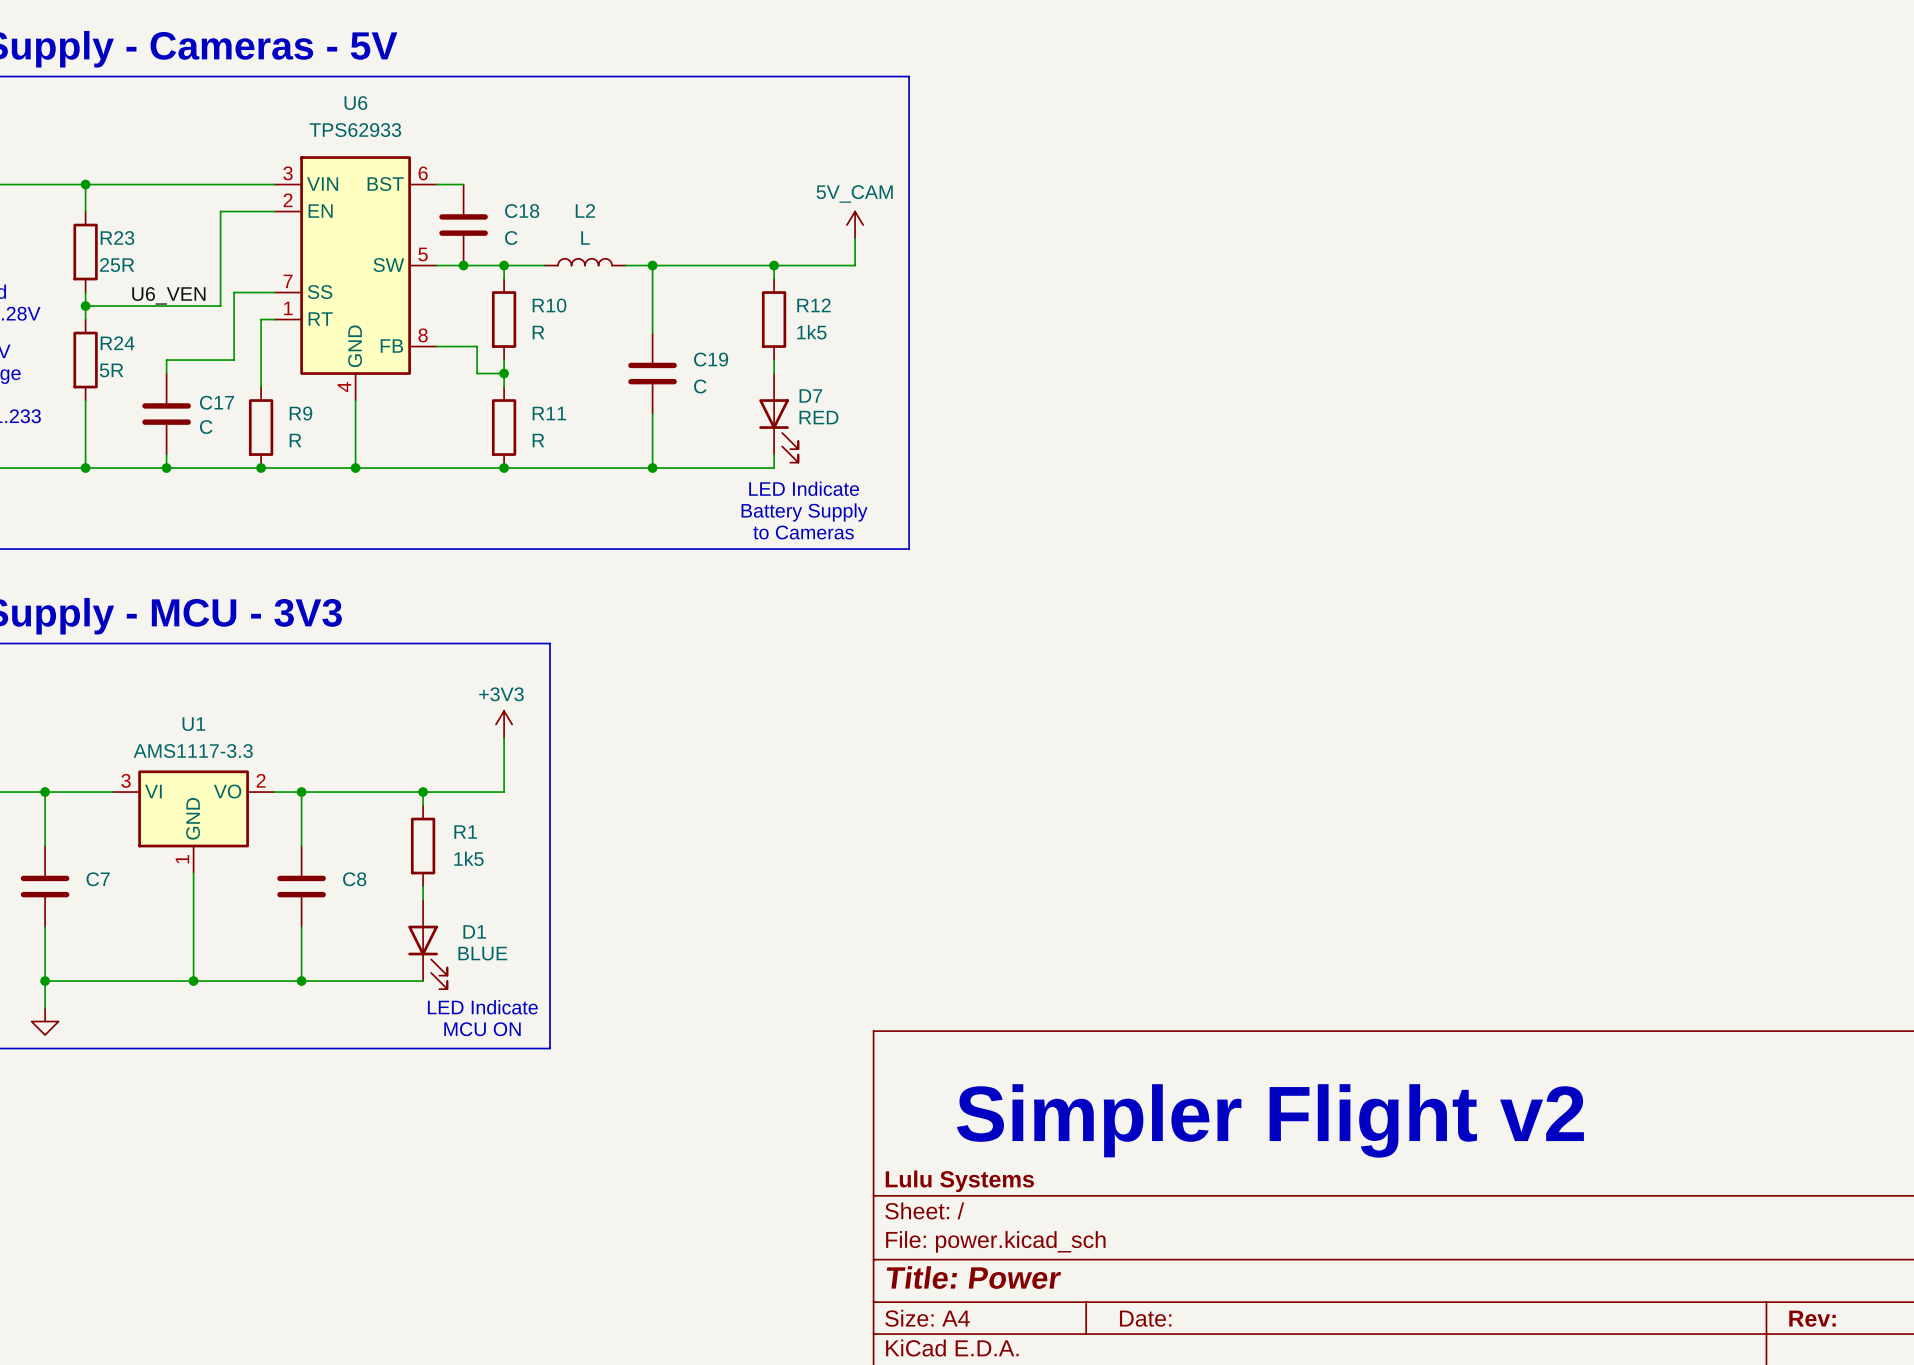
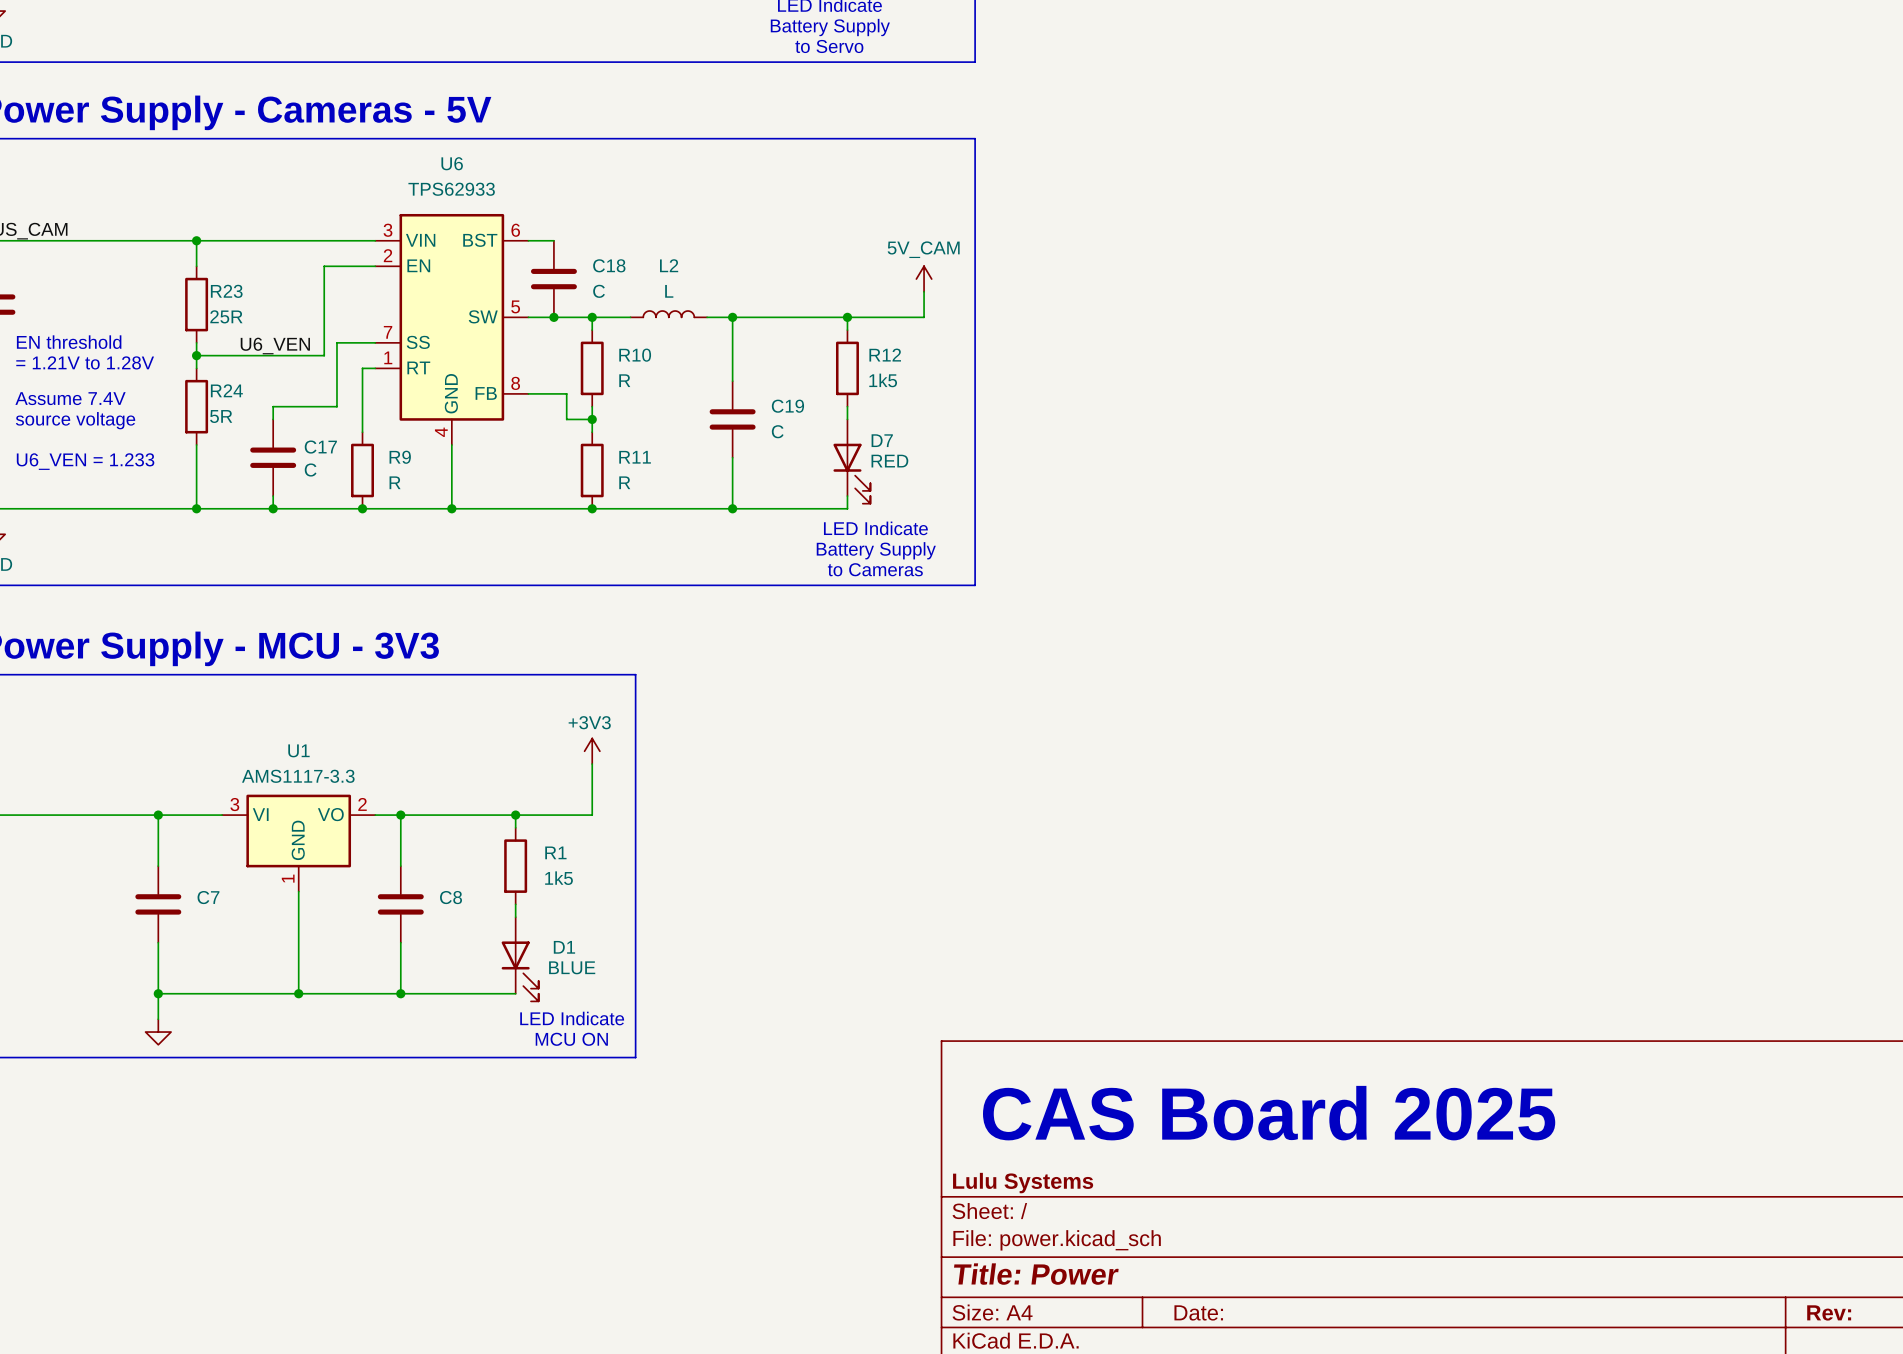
text: none -> CAS Board 2025 (1269, 1113)
text: Simpler Flight v2 (1270, 1120) -> none

